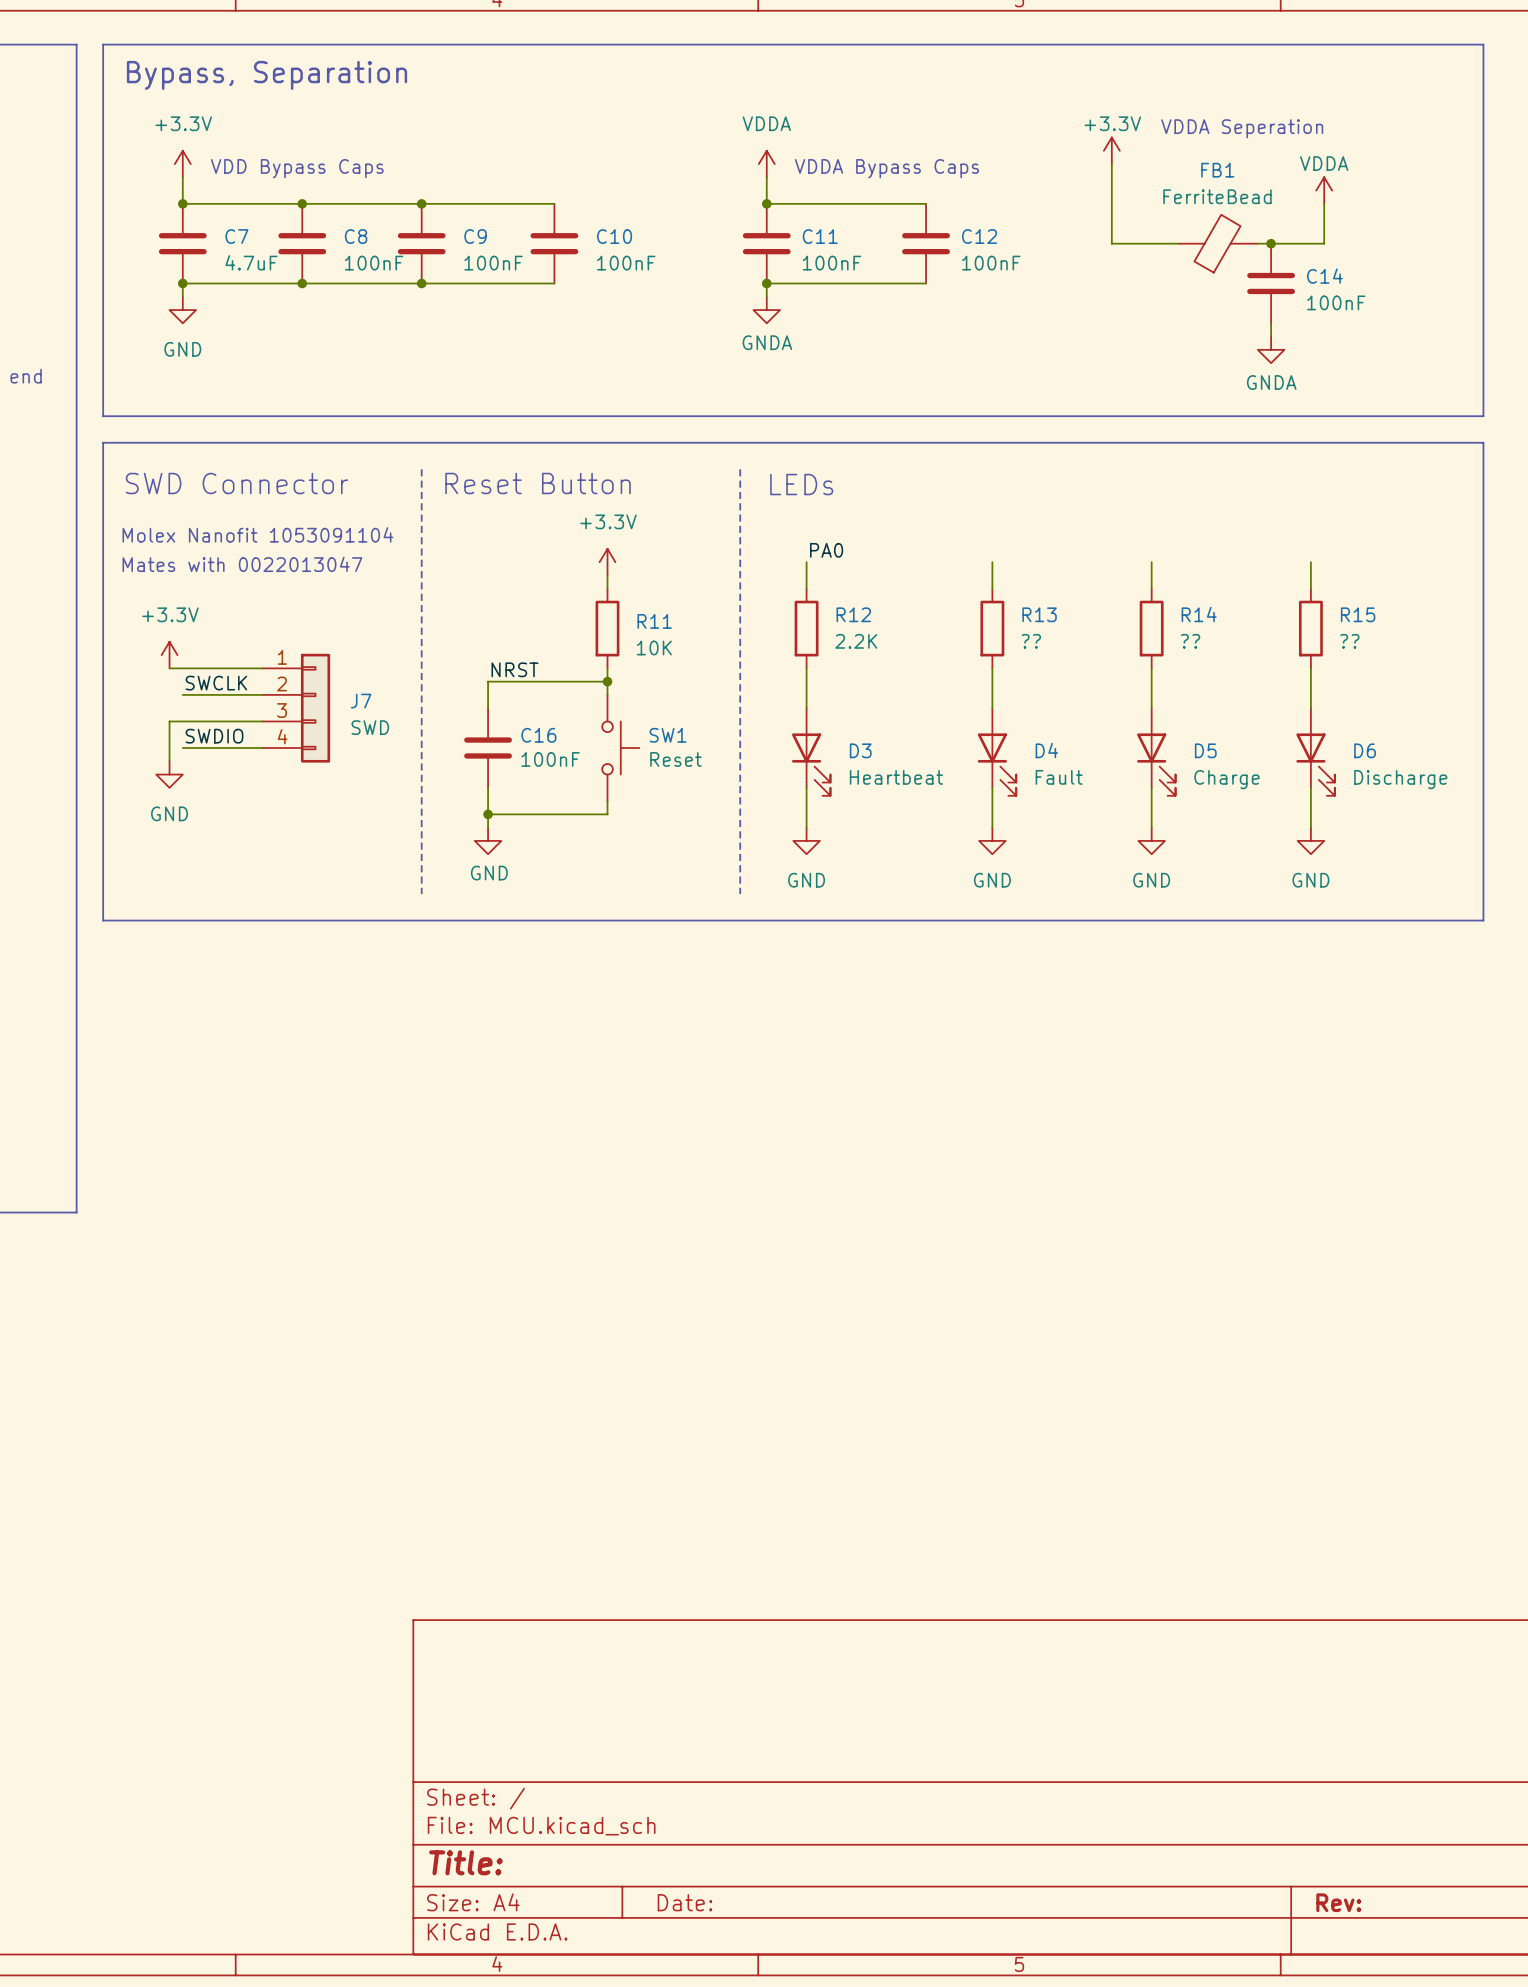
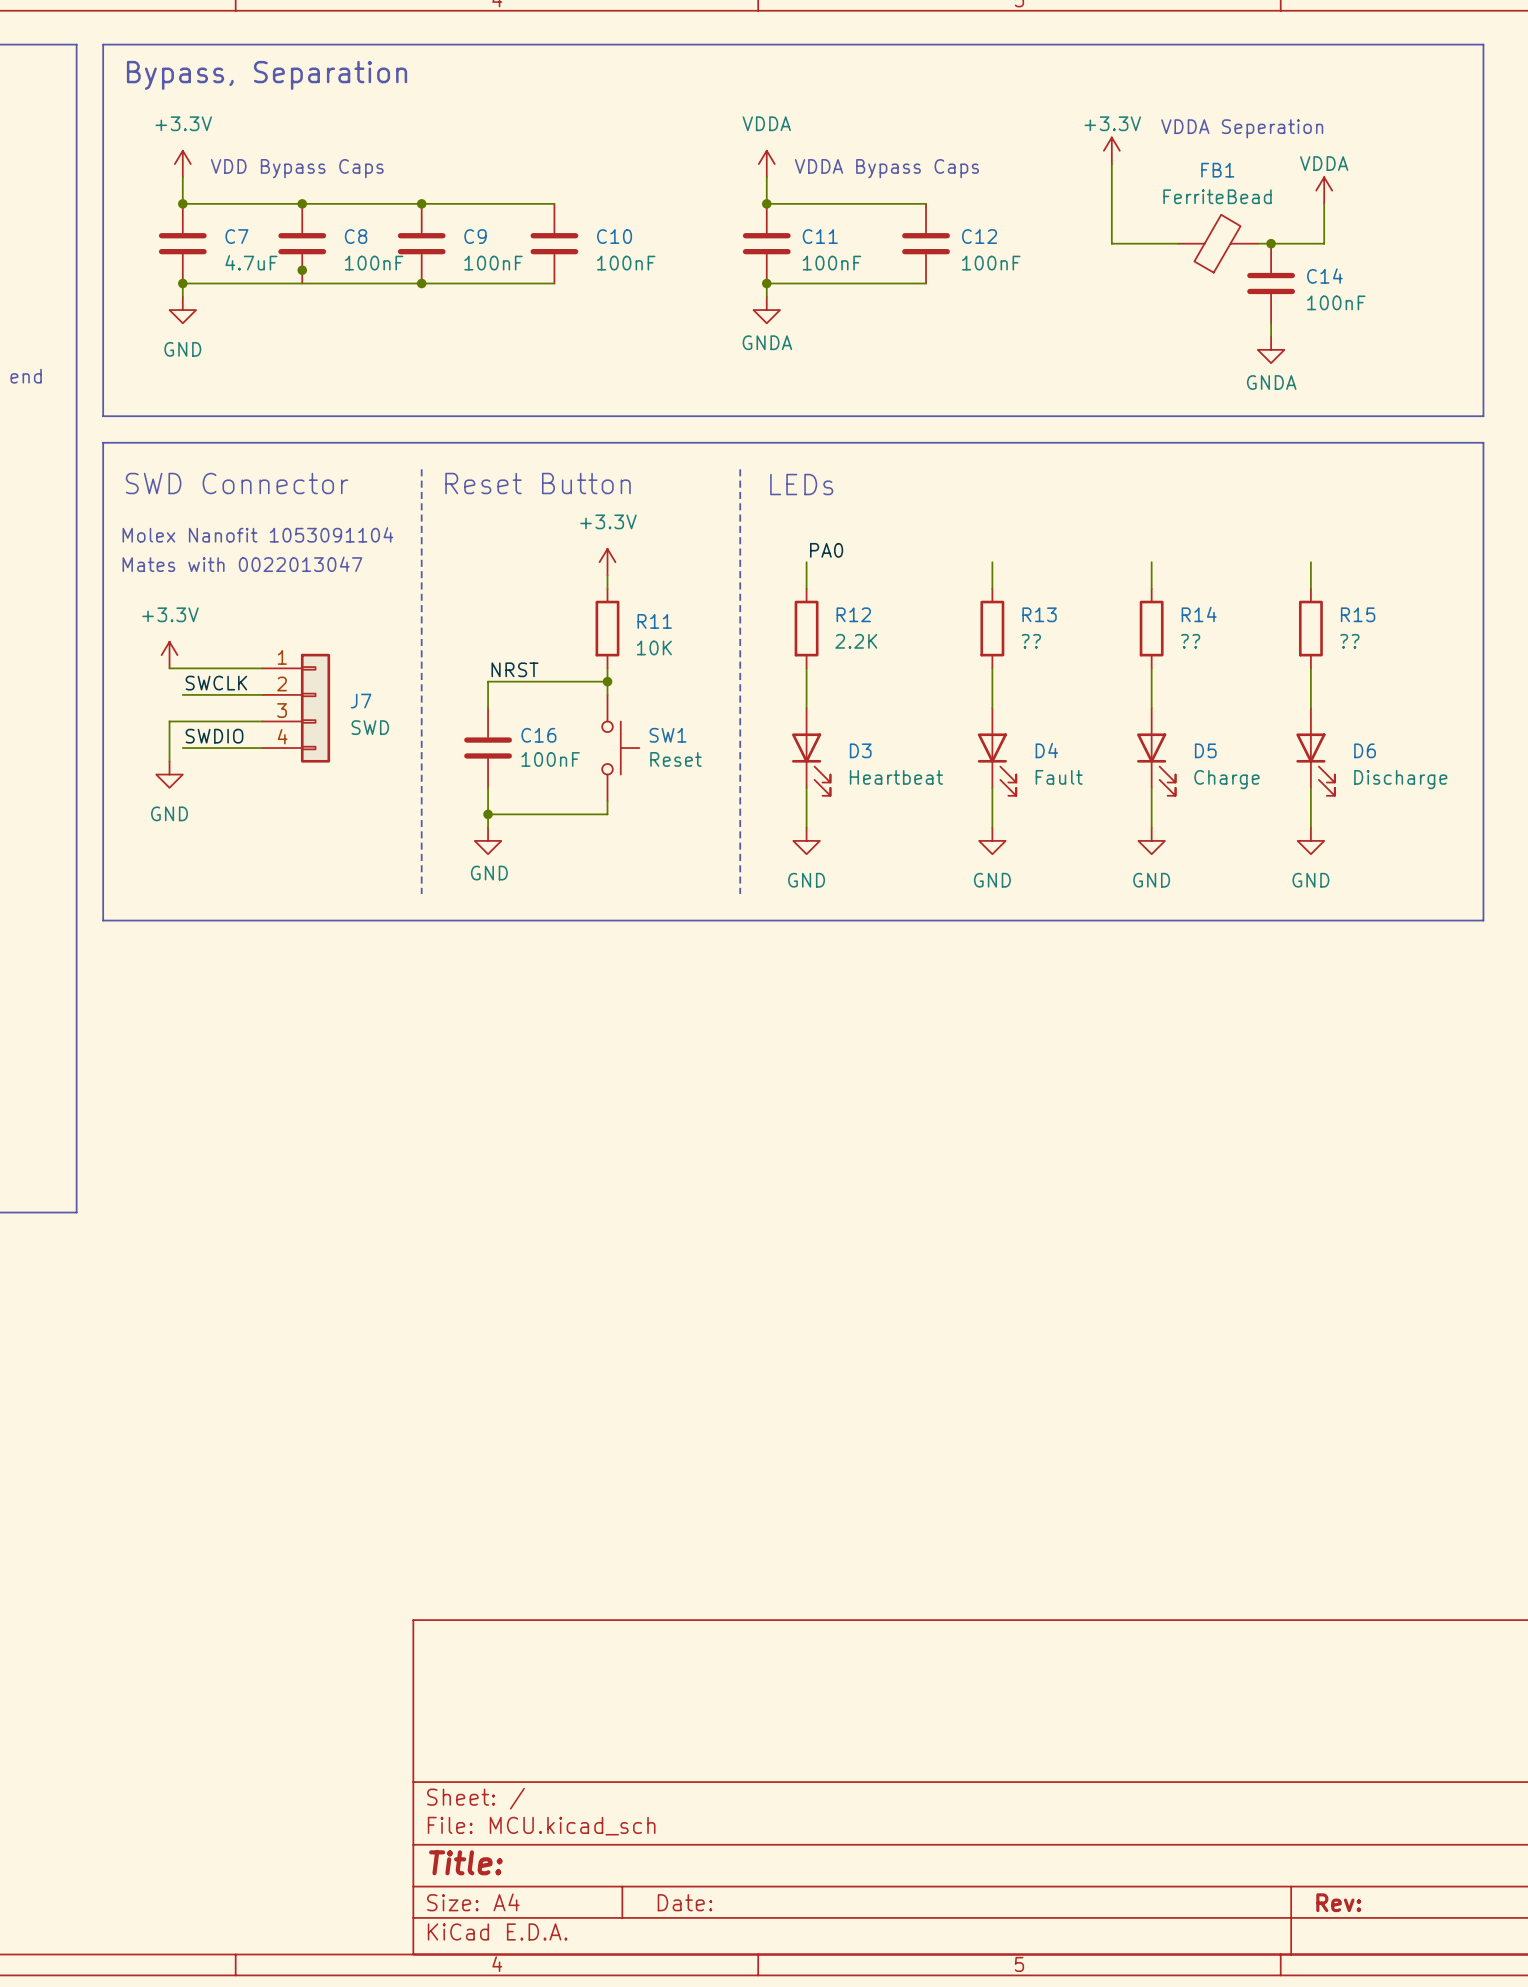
junction position: (302, 283) -> (302, 270)

